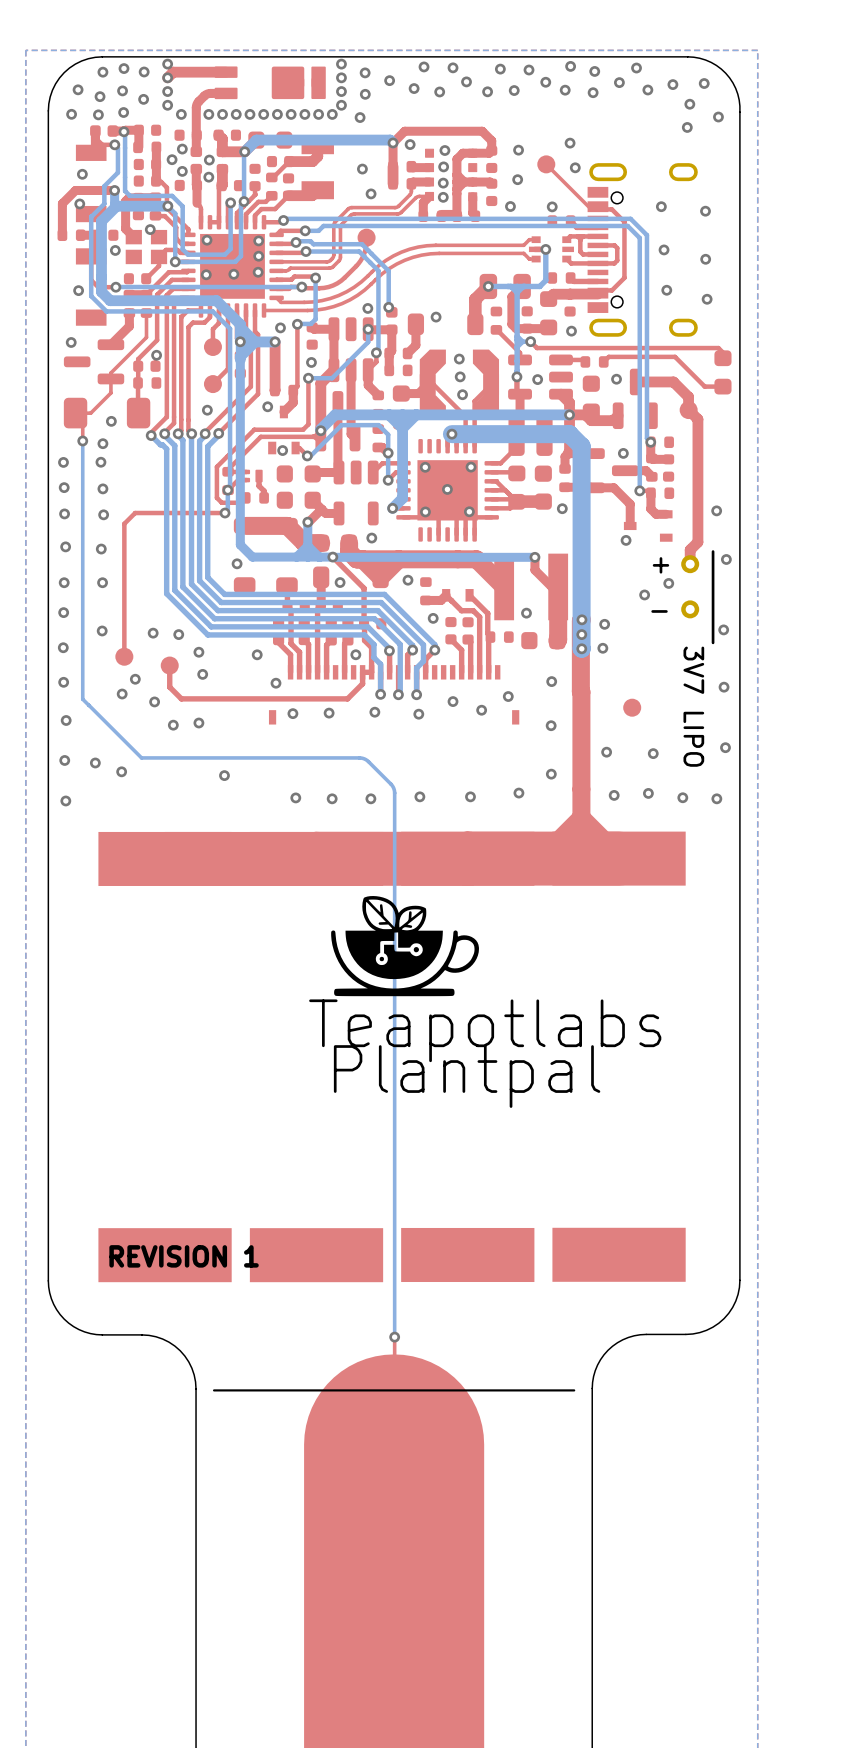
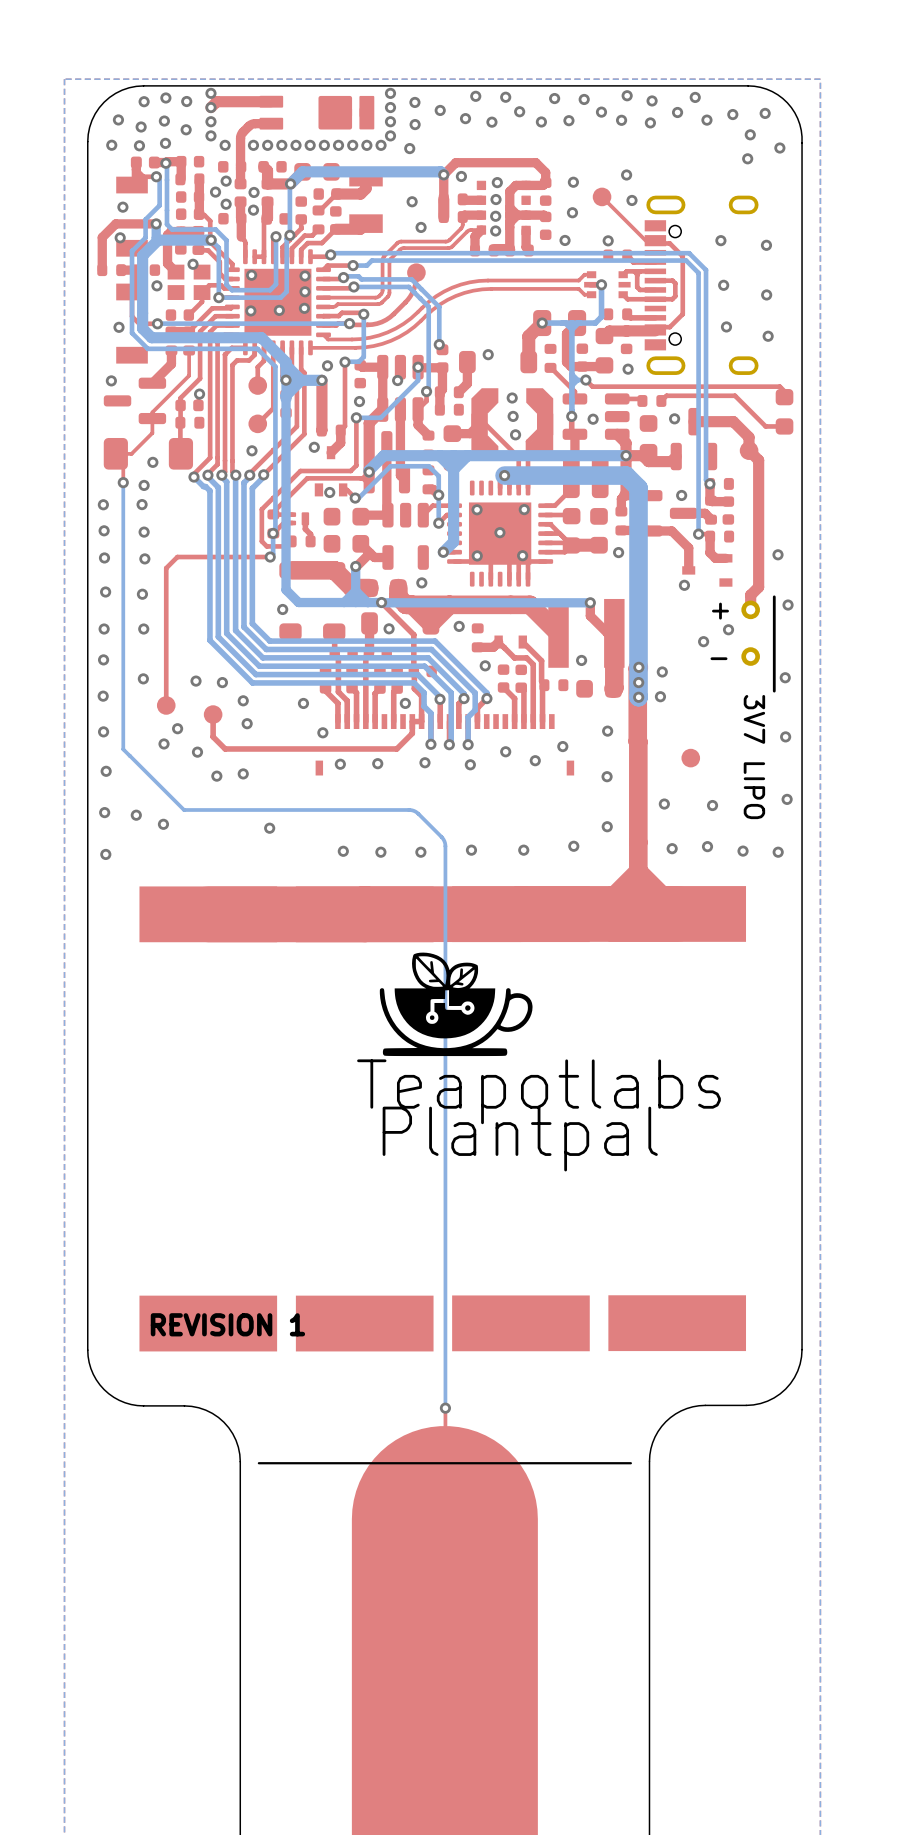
via position: (367, 308) -> (397, 380)

